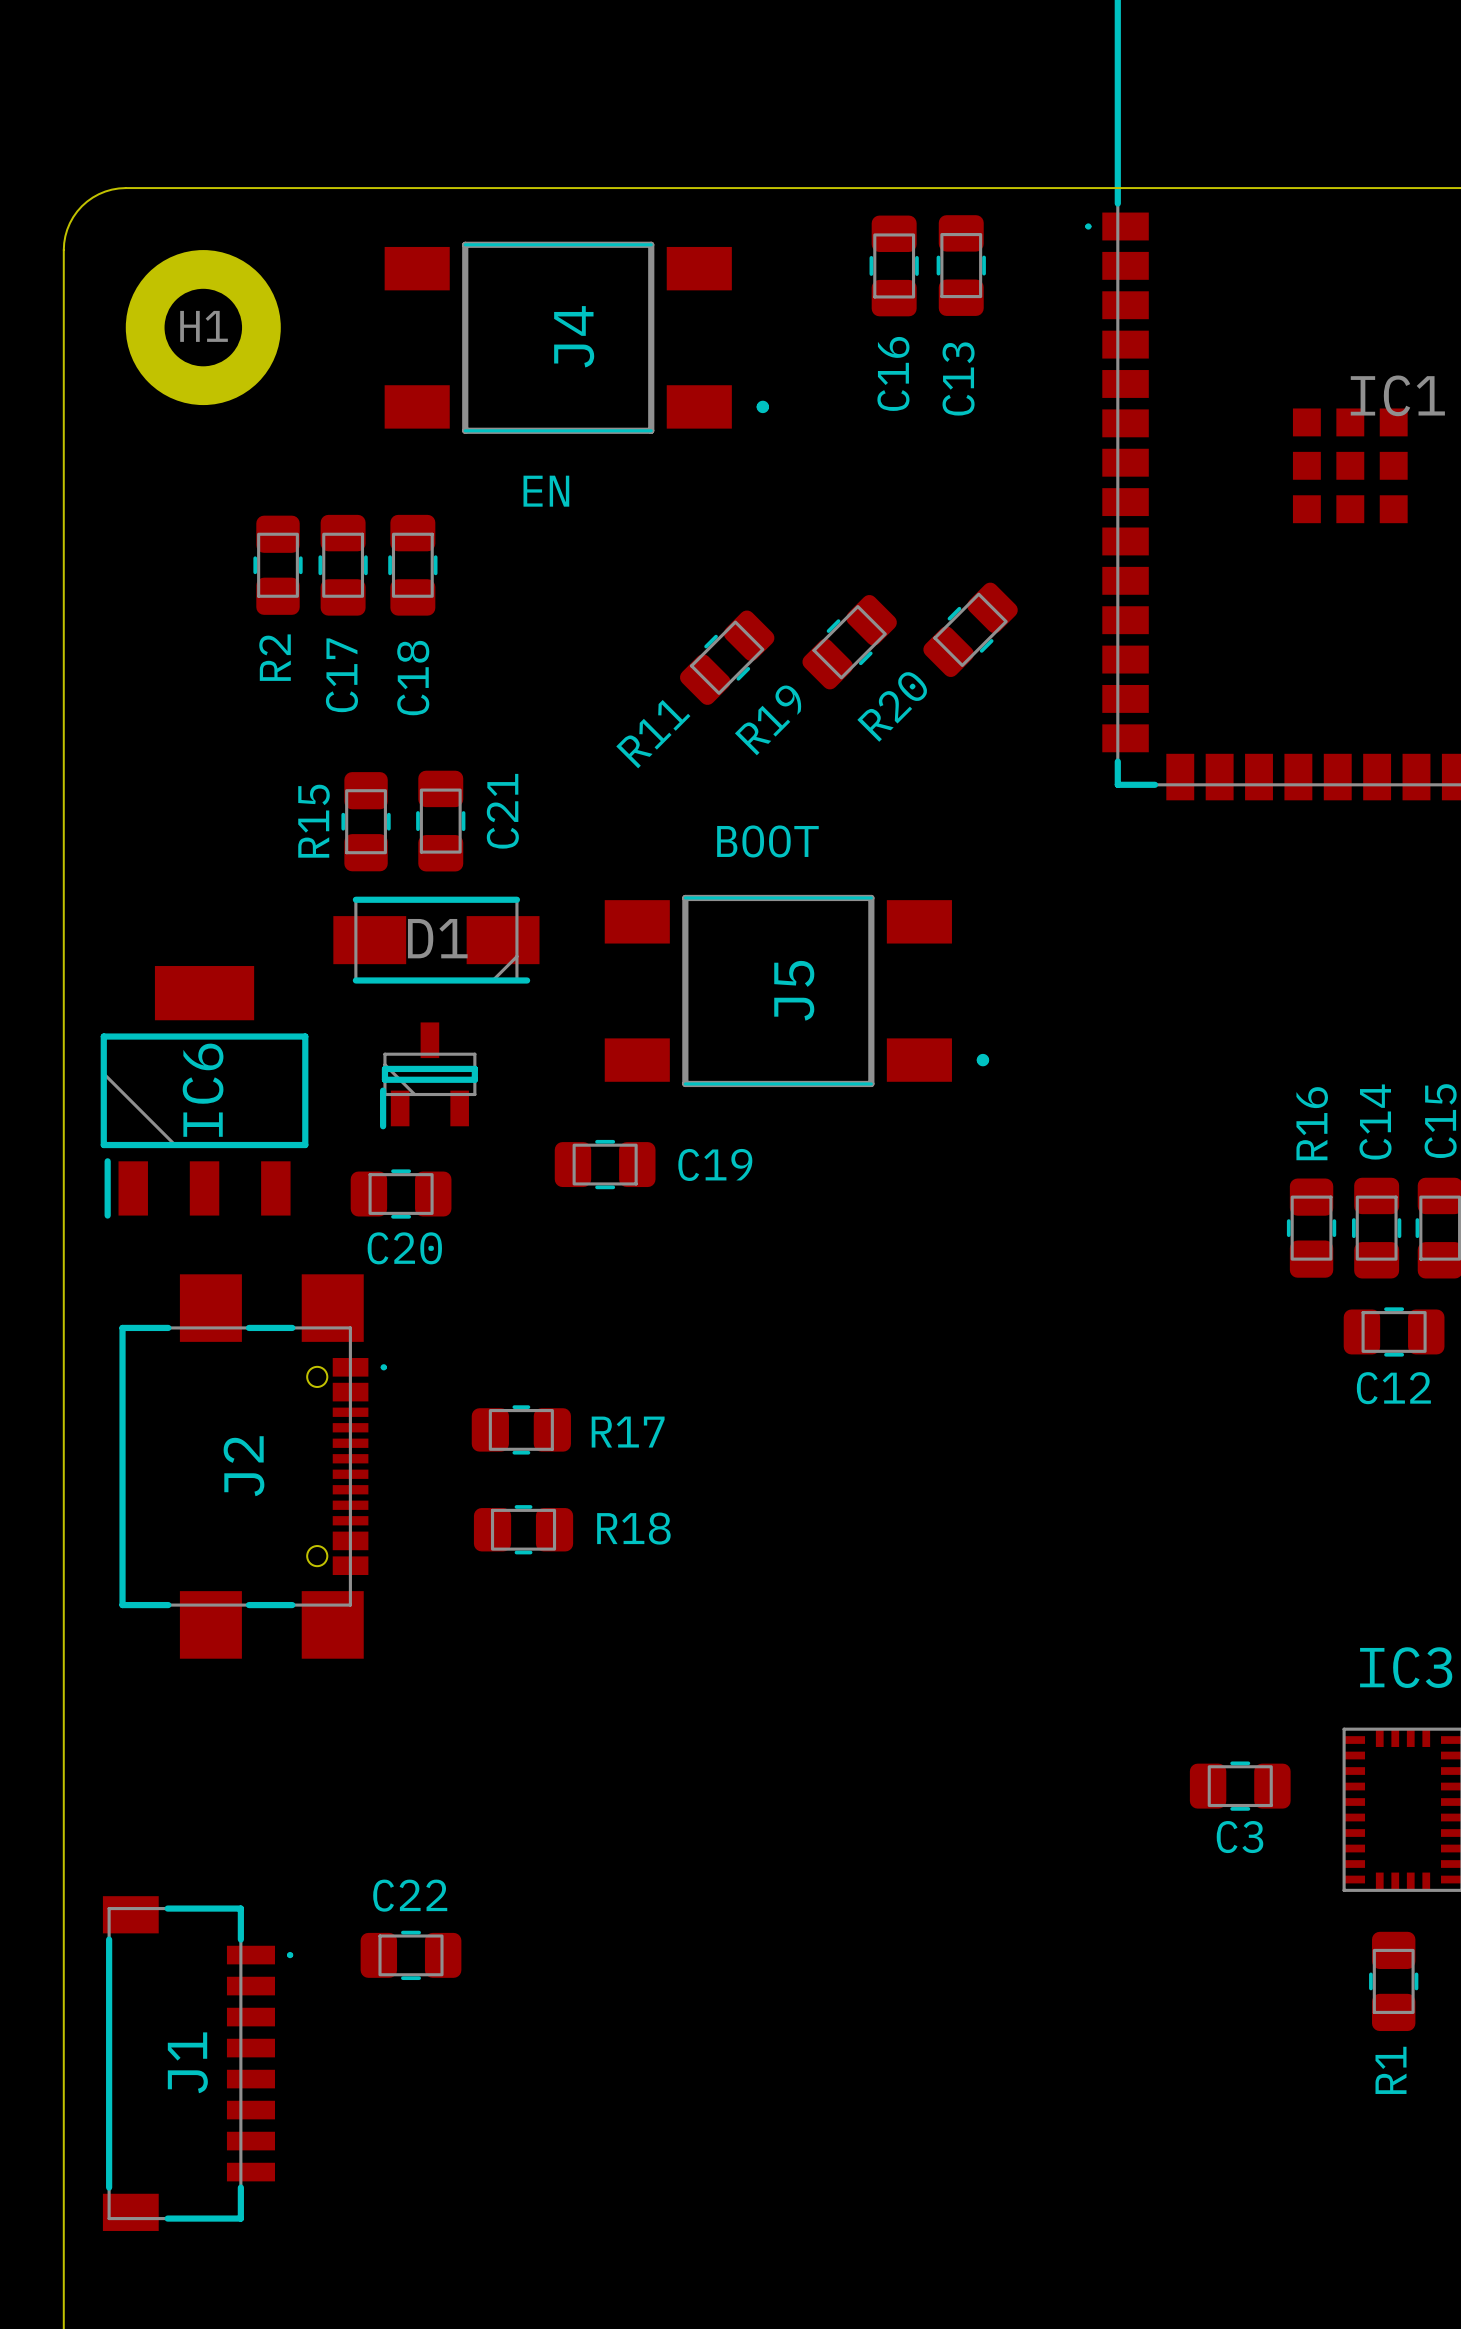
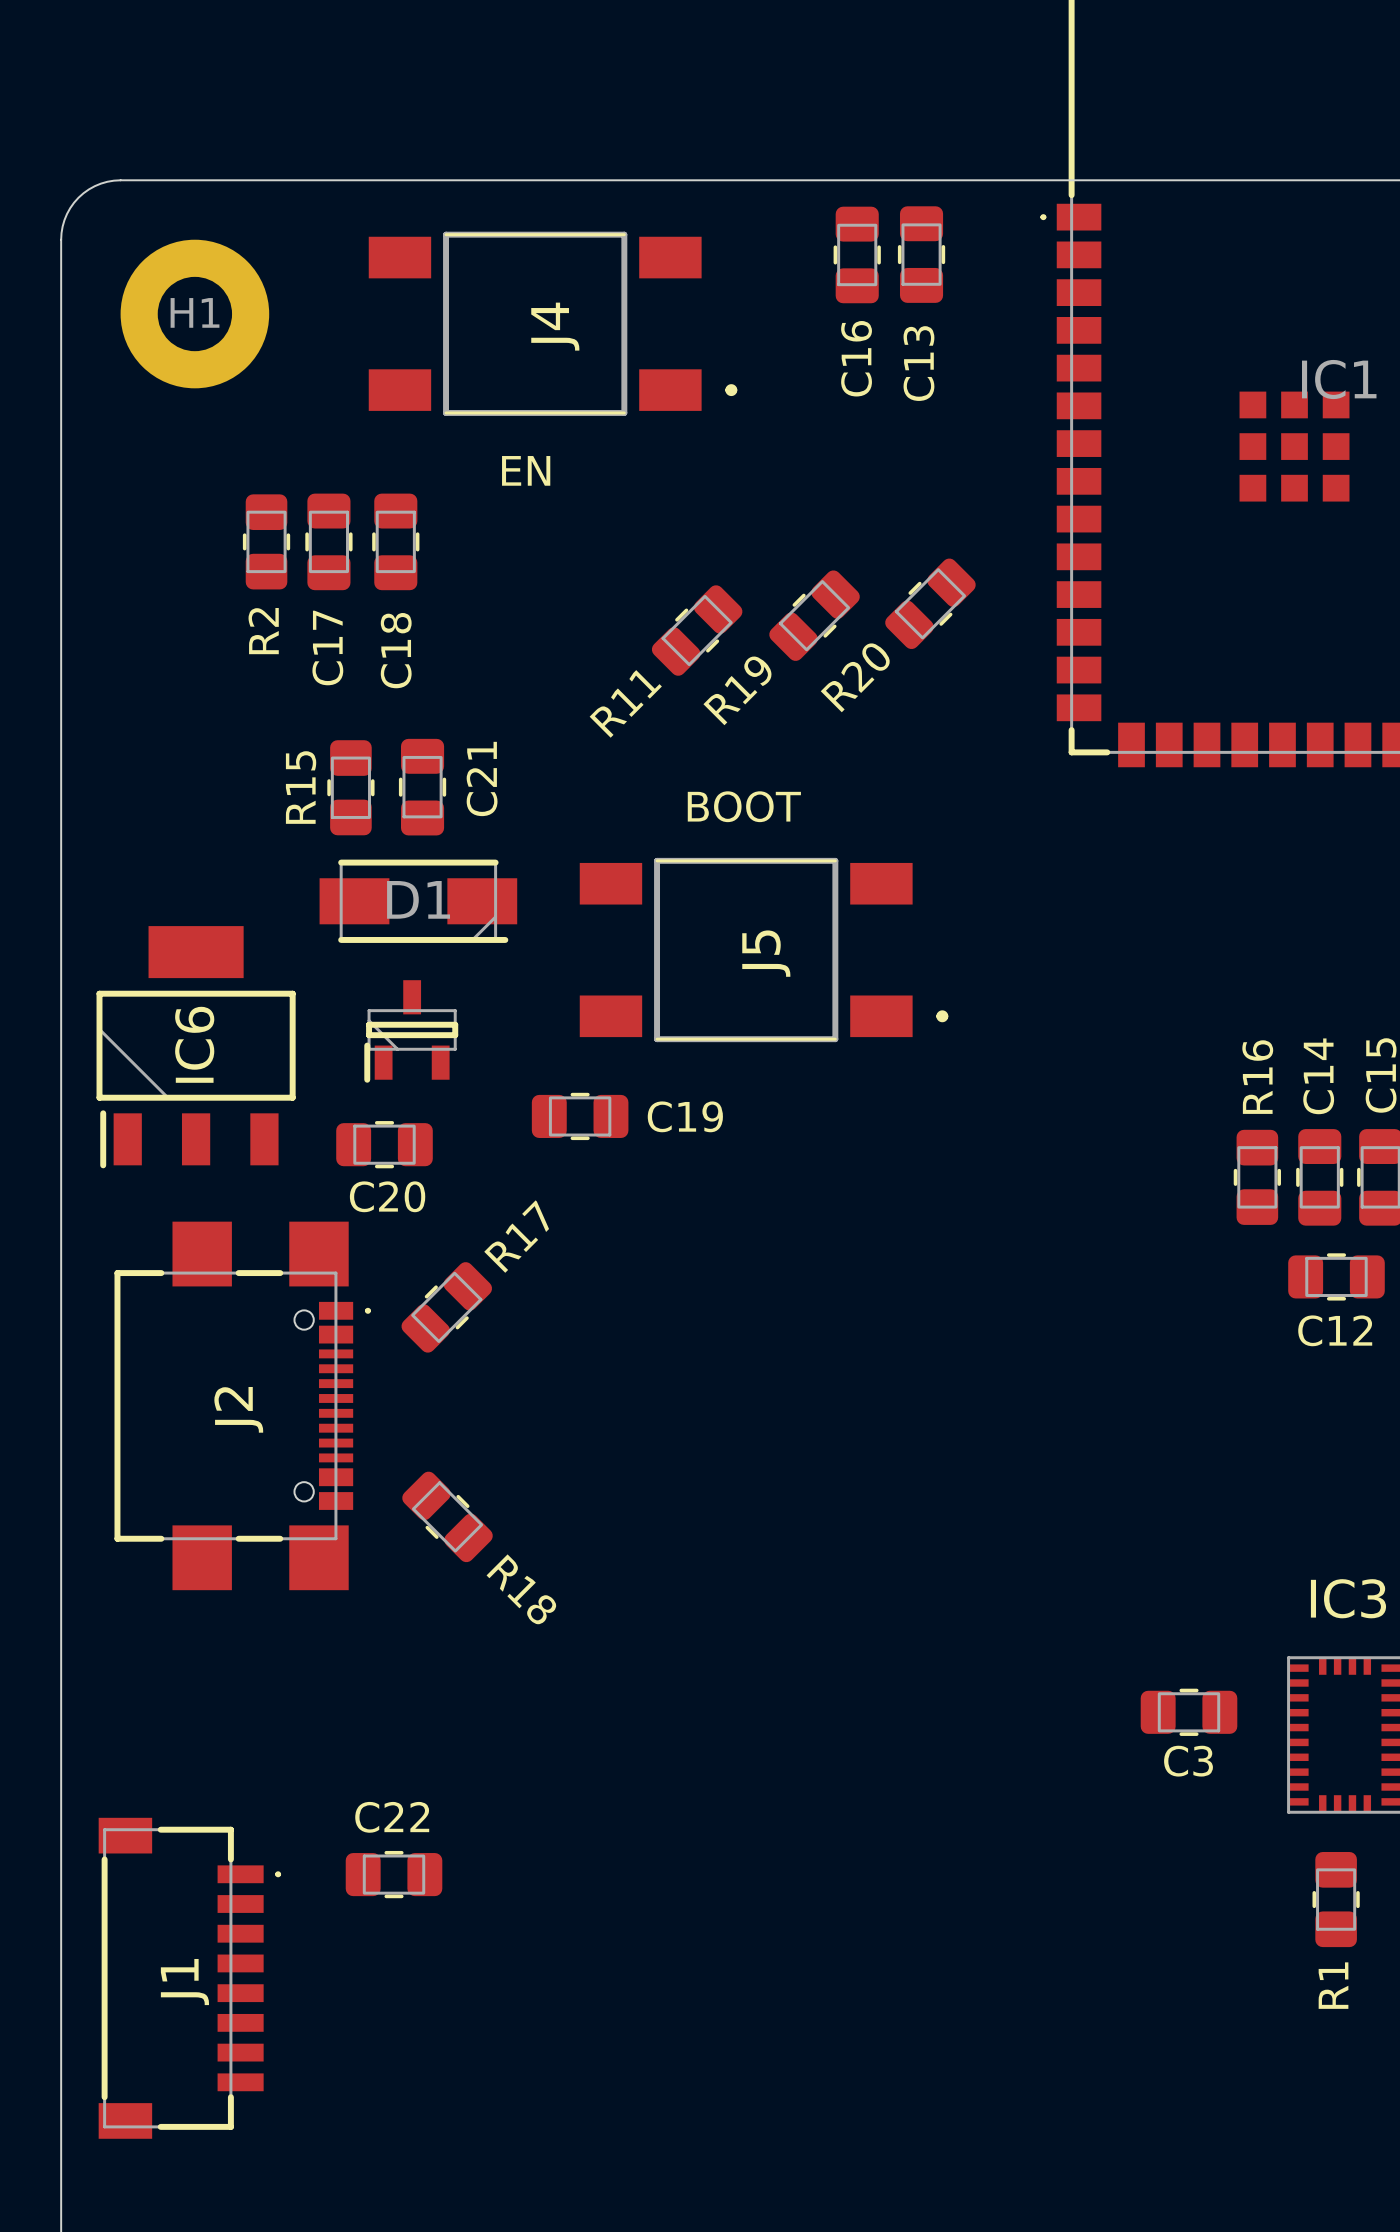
R17 rotation: 0° (521, 1429) -> 45° counterclockwise (446, 1307)
R17 position: (521, 1429) -> (446, 1307)
R18 rotation: 0° (523, 1529) -> 45° clockwise (447, 1516)
R18 position: (523, 1529) -> (447, 1516)

